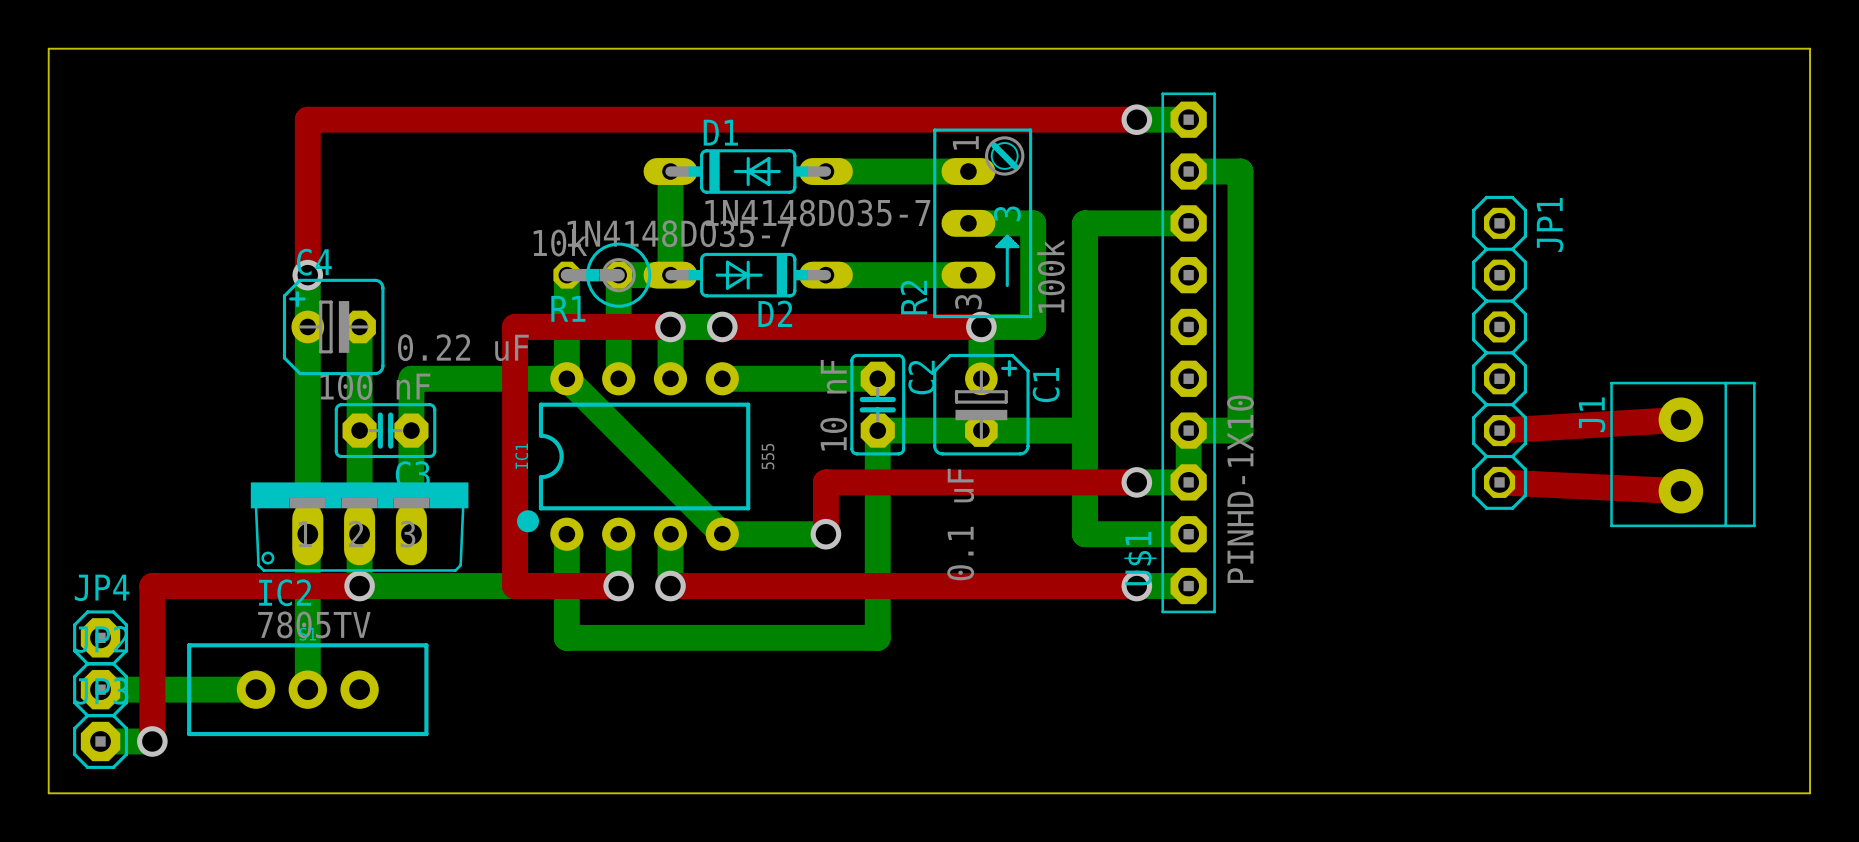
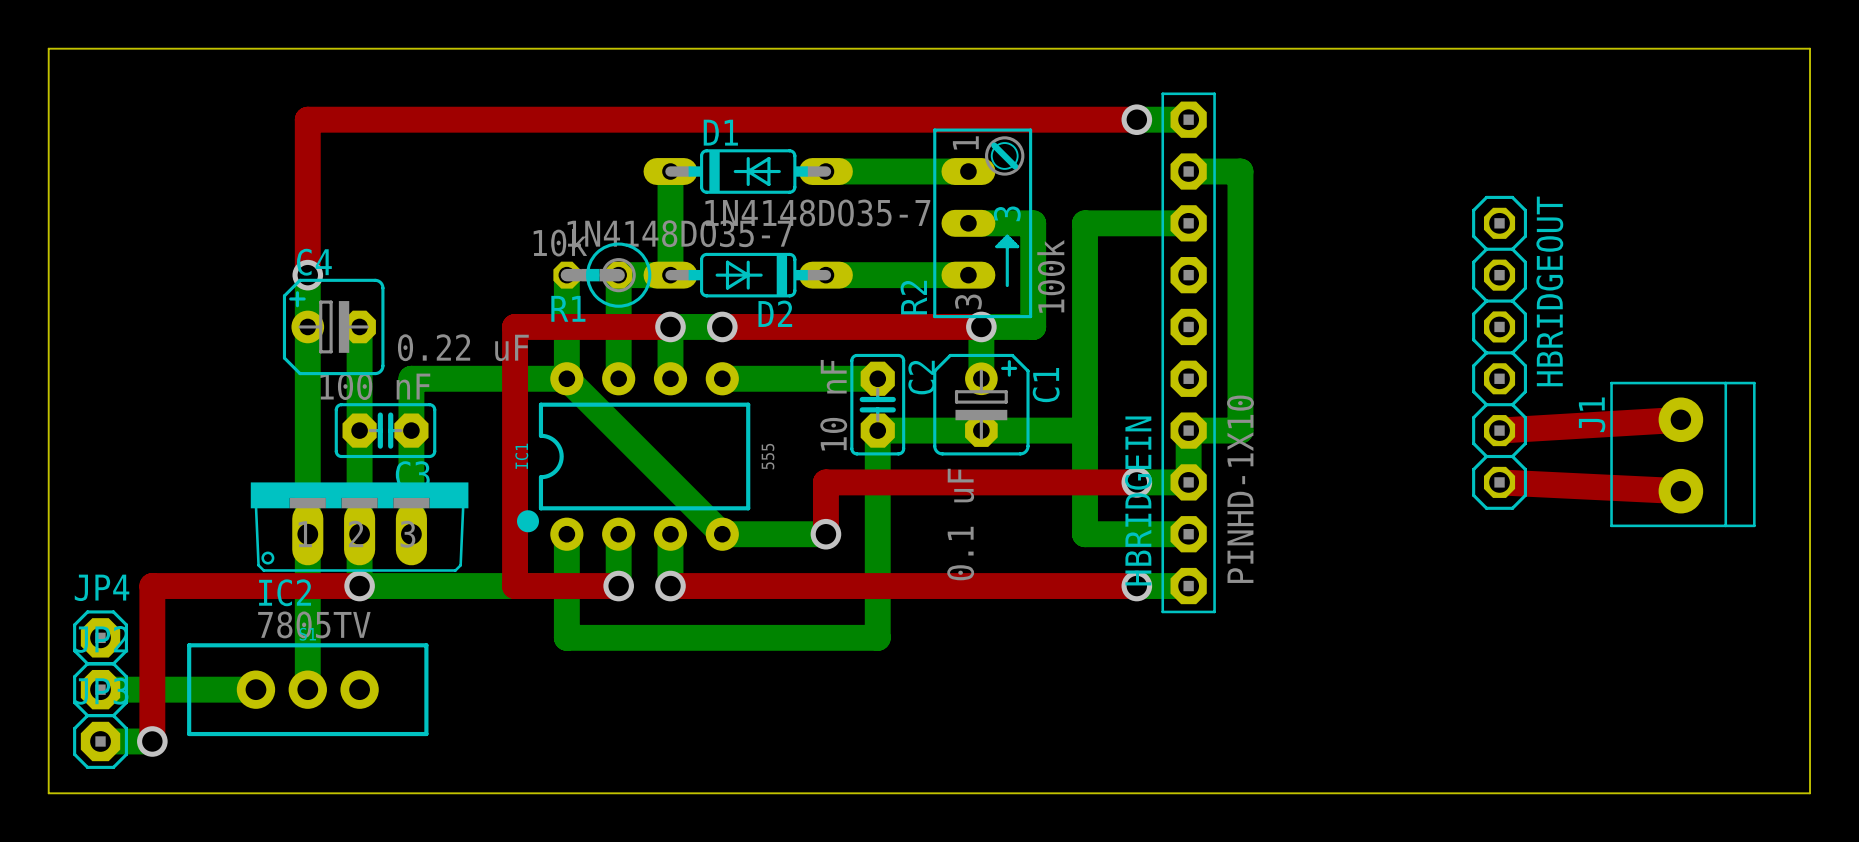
JP1 name: JP1 (1550, 224) -> HBRIDGEOUT (1549, 291)
U$1 name: U$1 (1140, 558) -> HBRIDGEIN (1138, 500)

